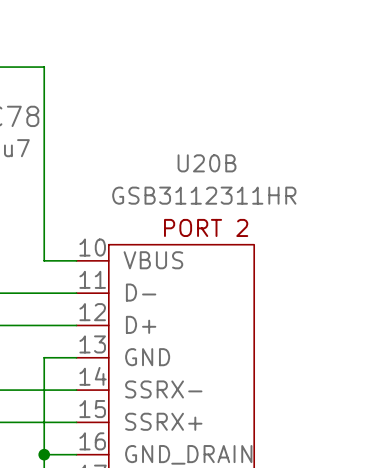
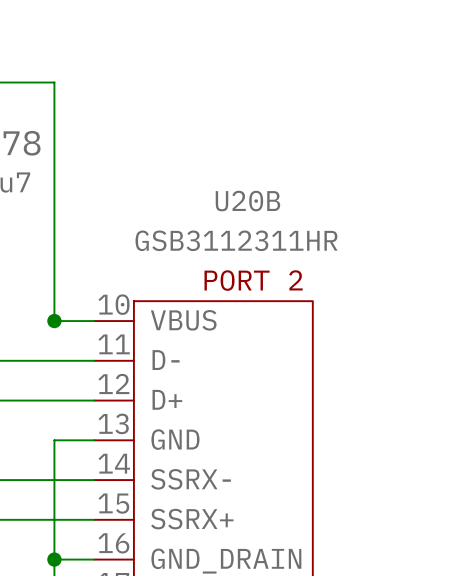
junction: none -> (54, 321)

